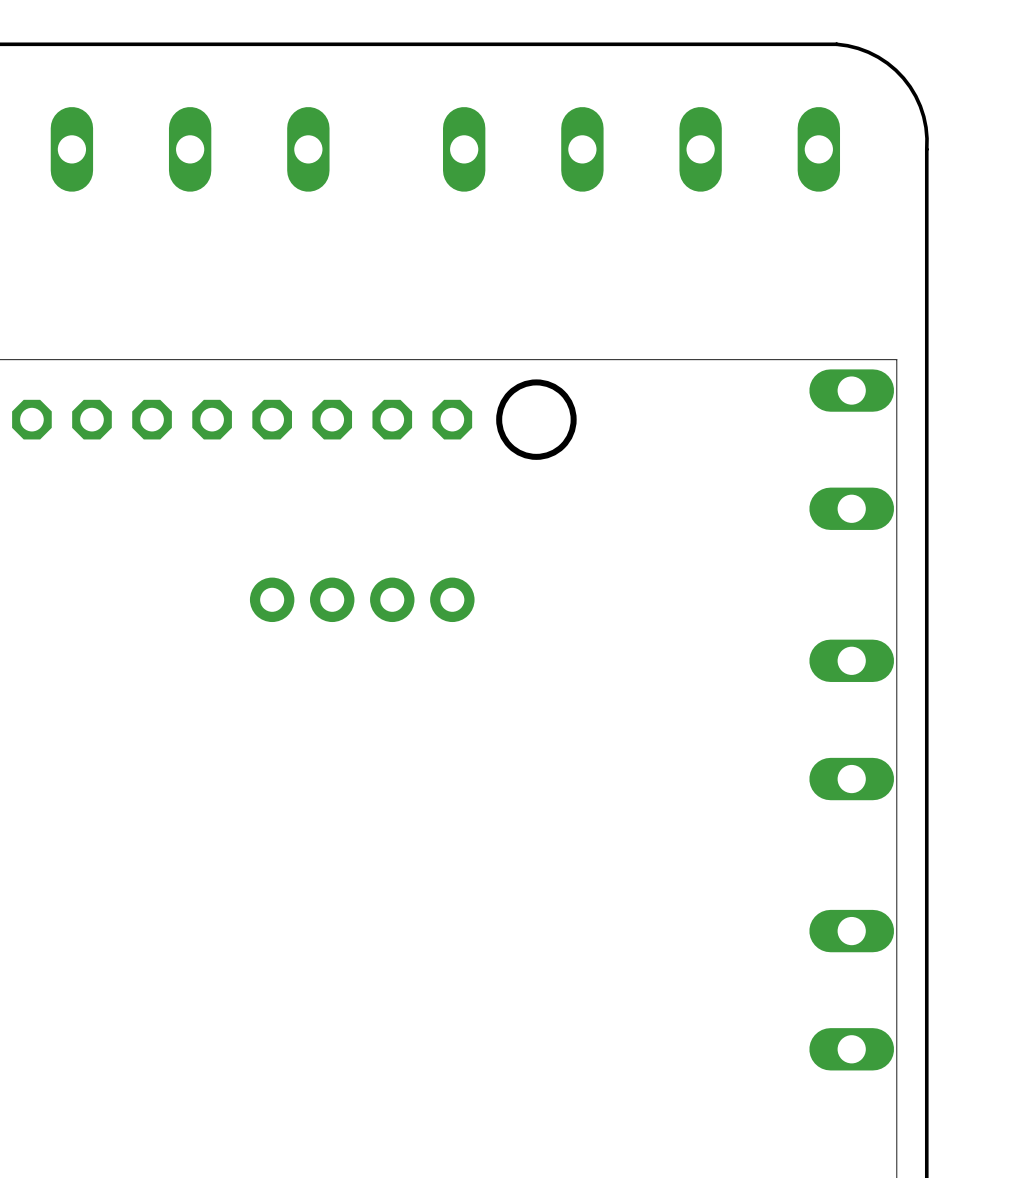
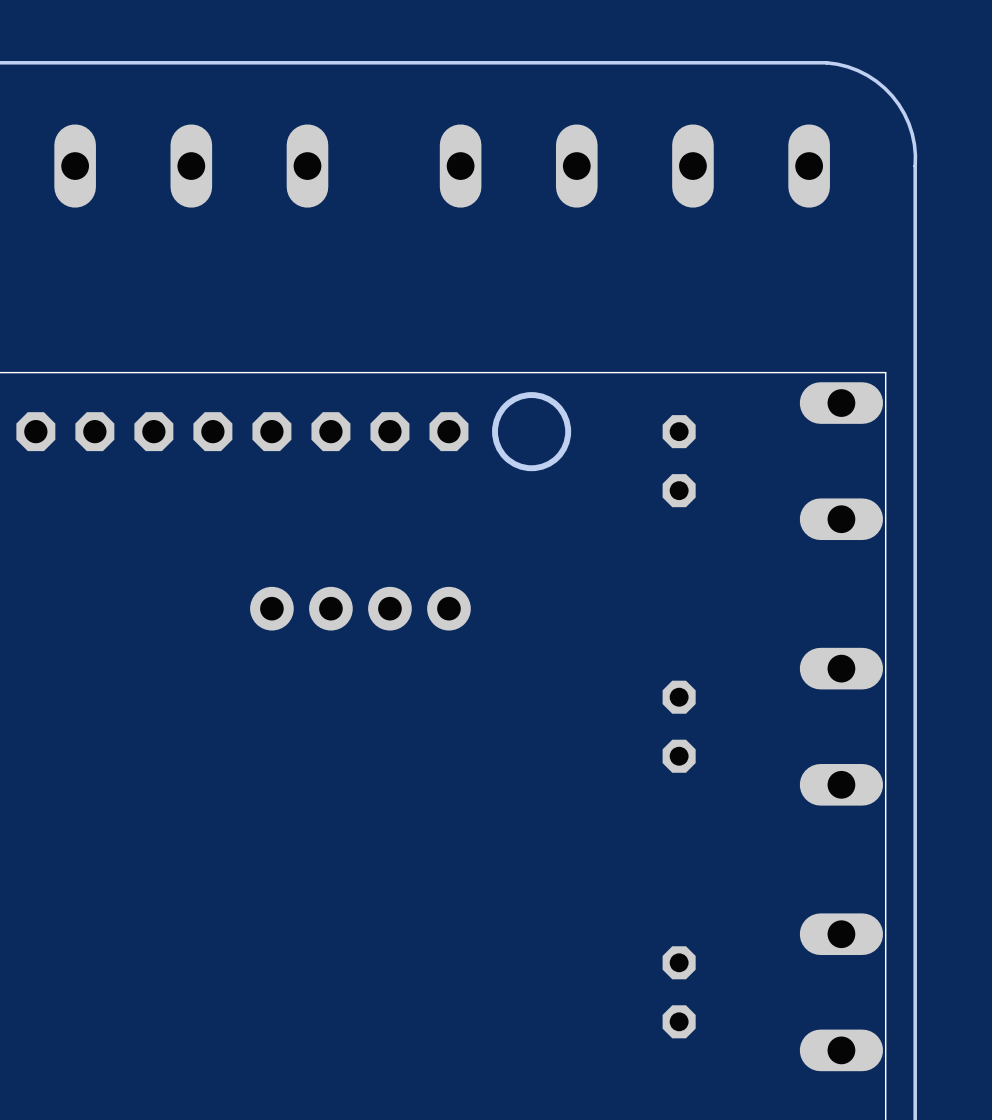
part: none -> (679, 461)
part: none -> (679, 726)
part: none -> (679, 992)

